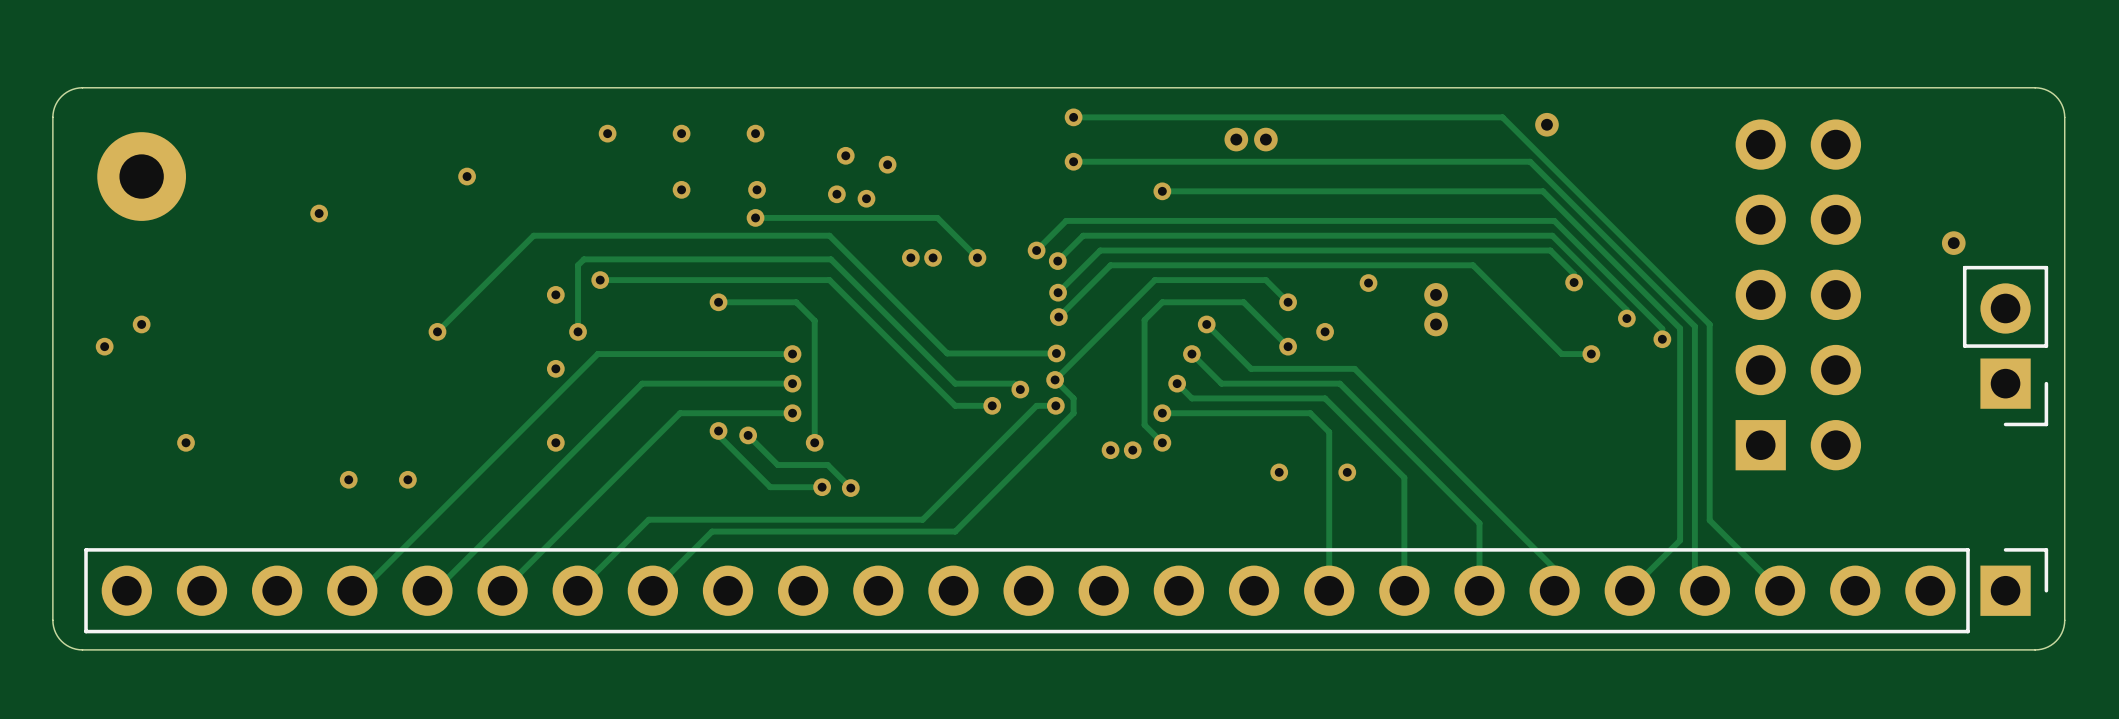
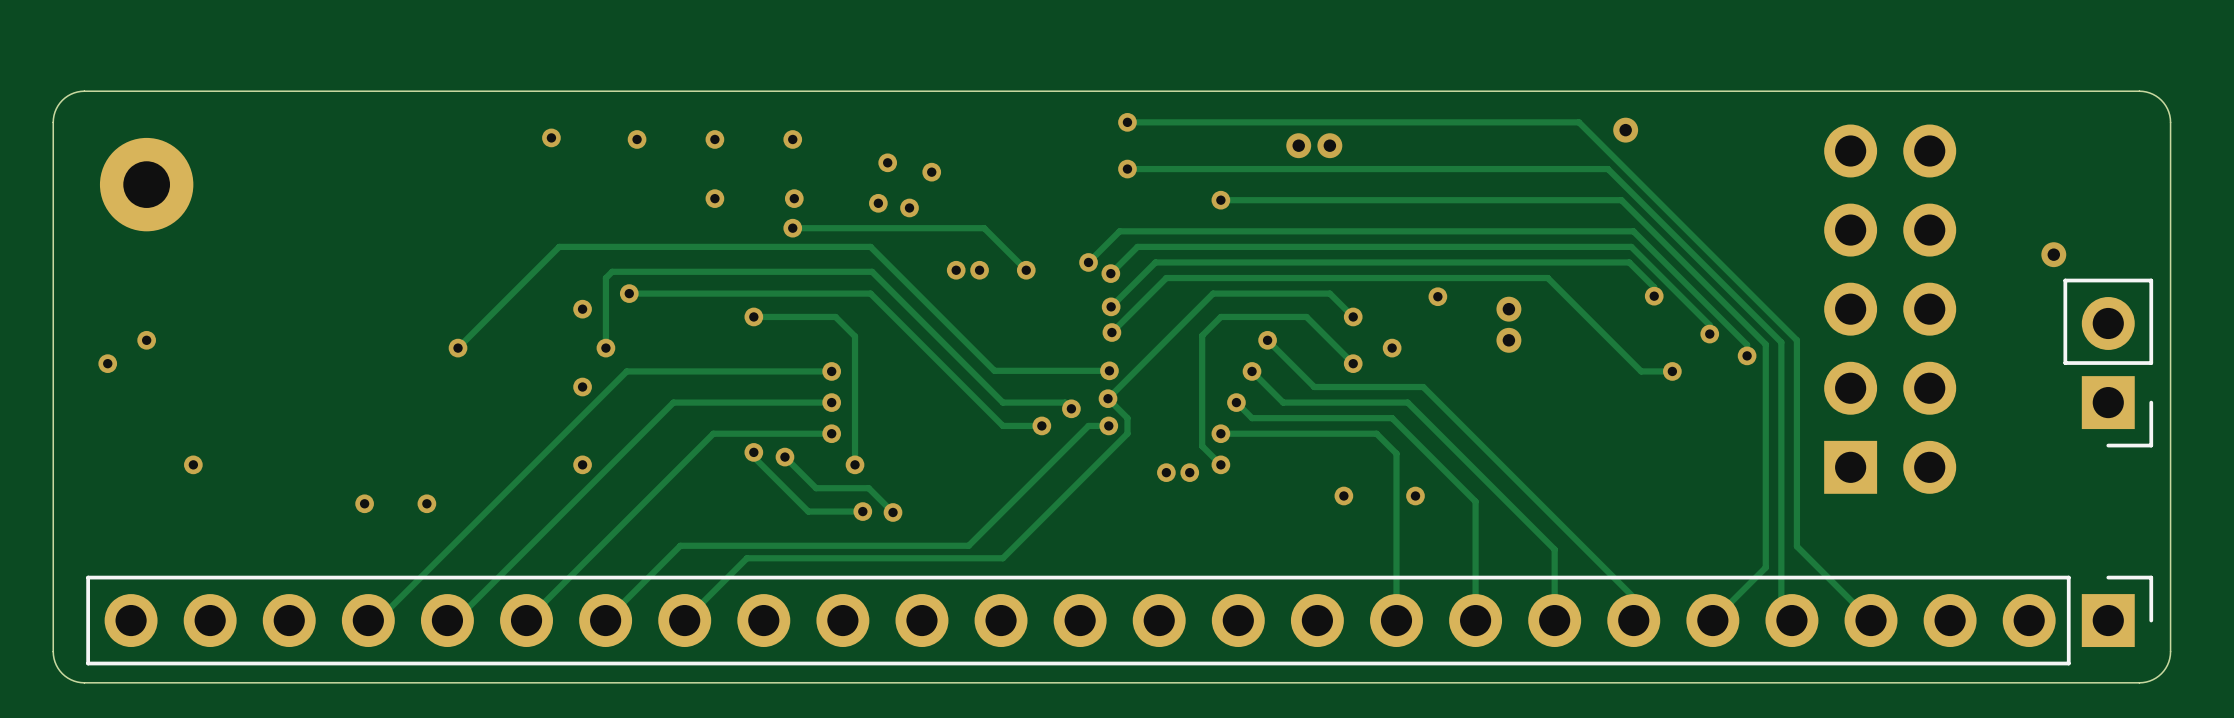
via position: (467, 176) -> (551, 137)
via: (319, 213) -> none

